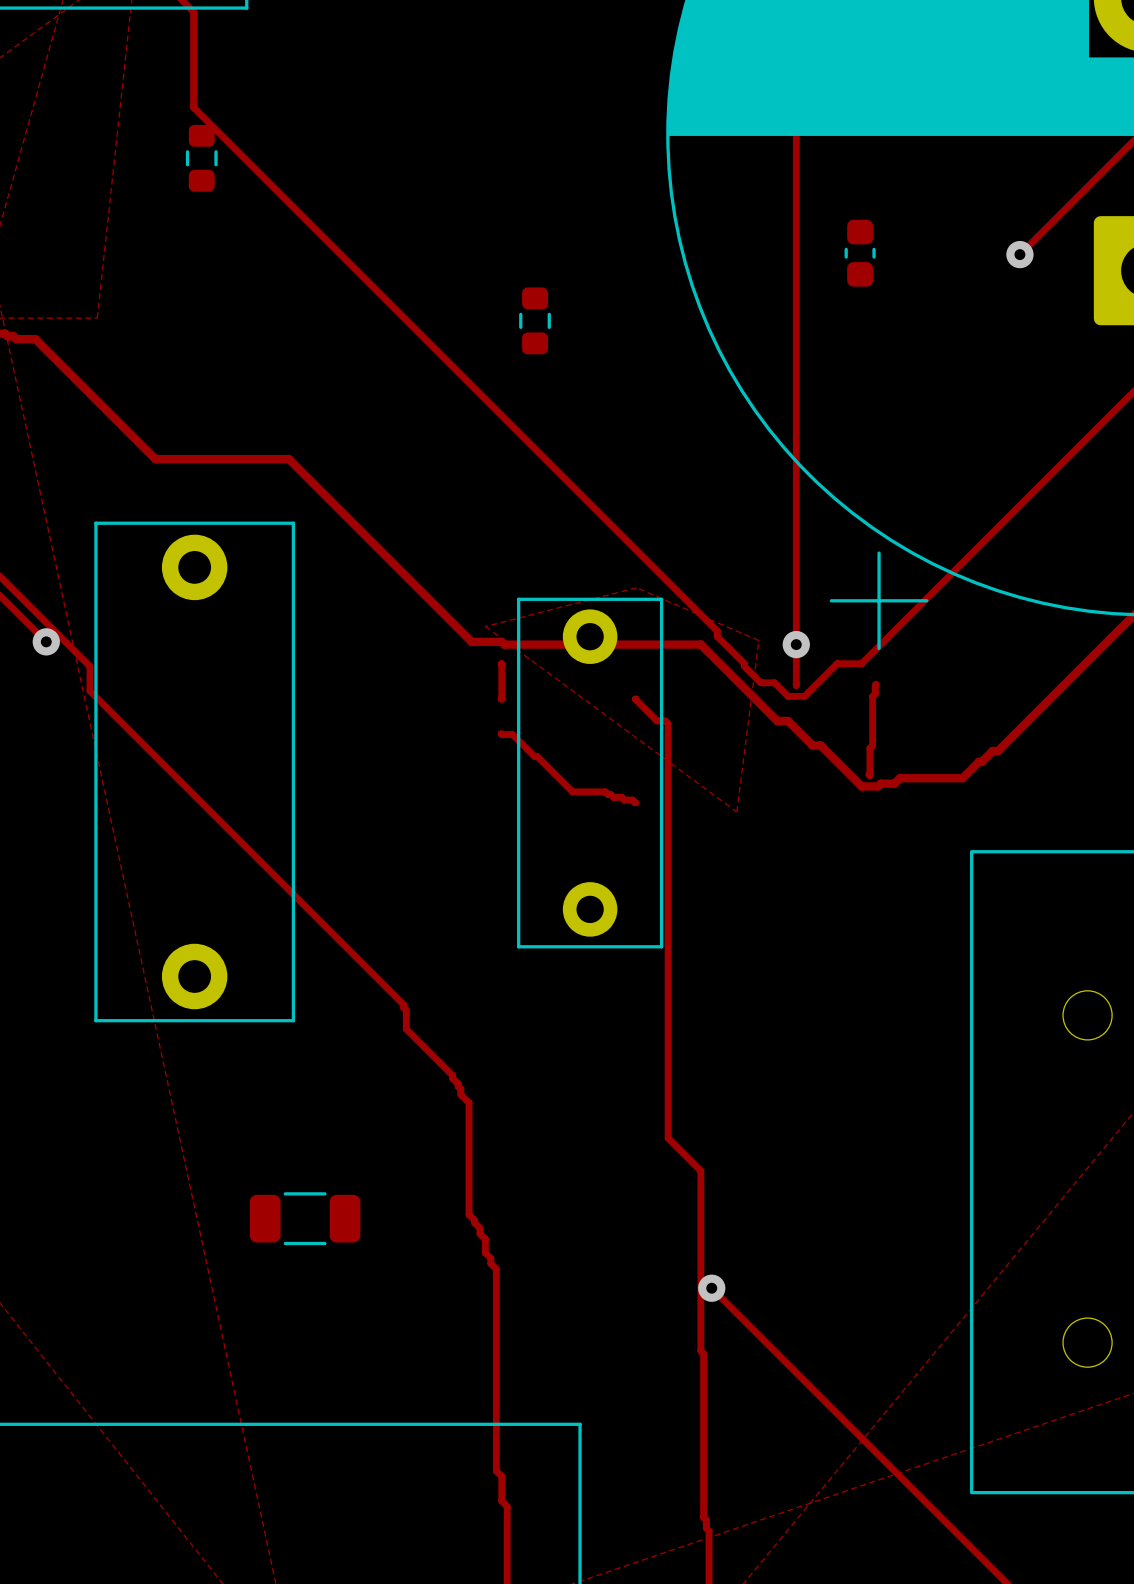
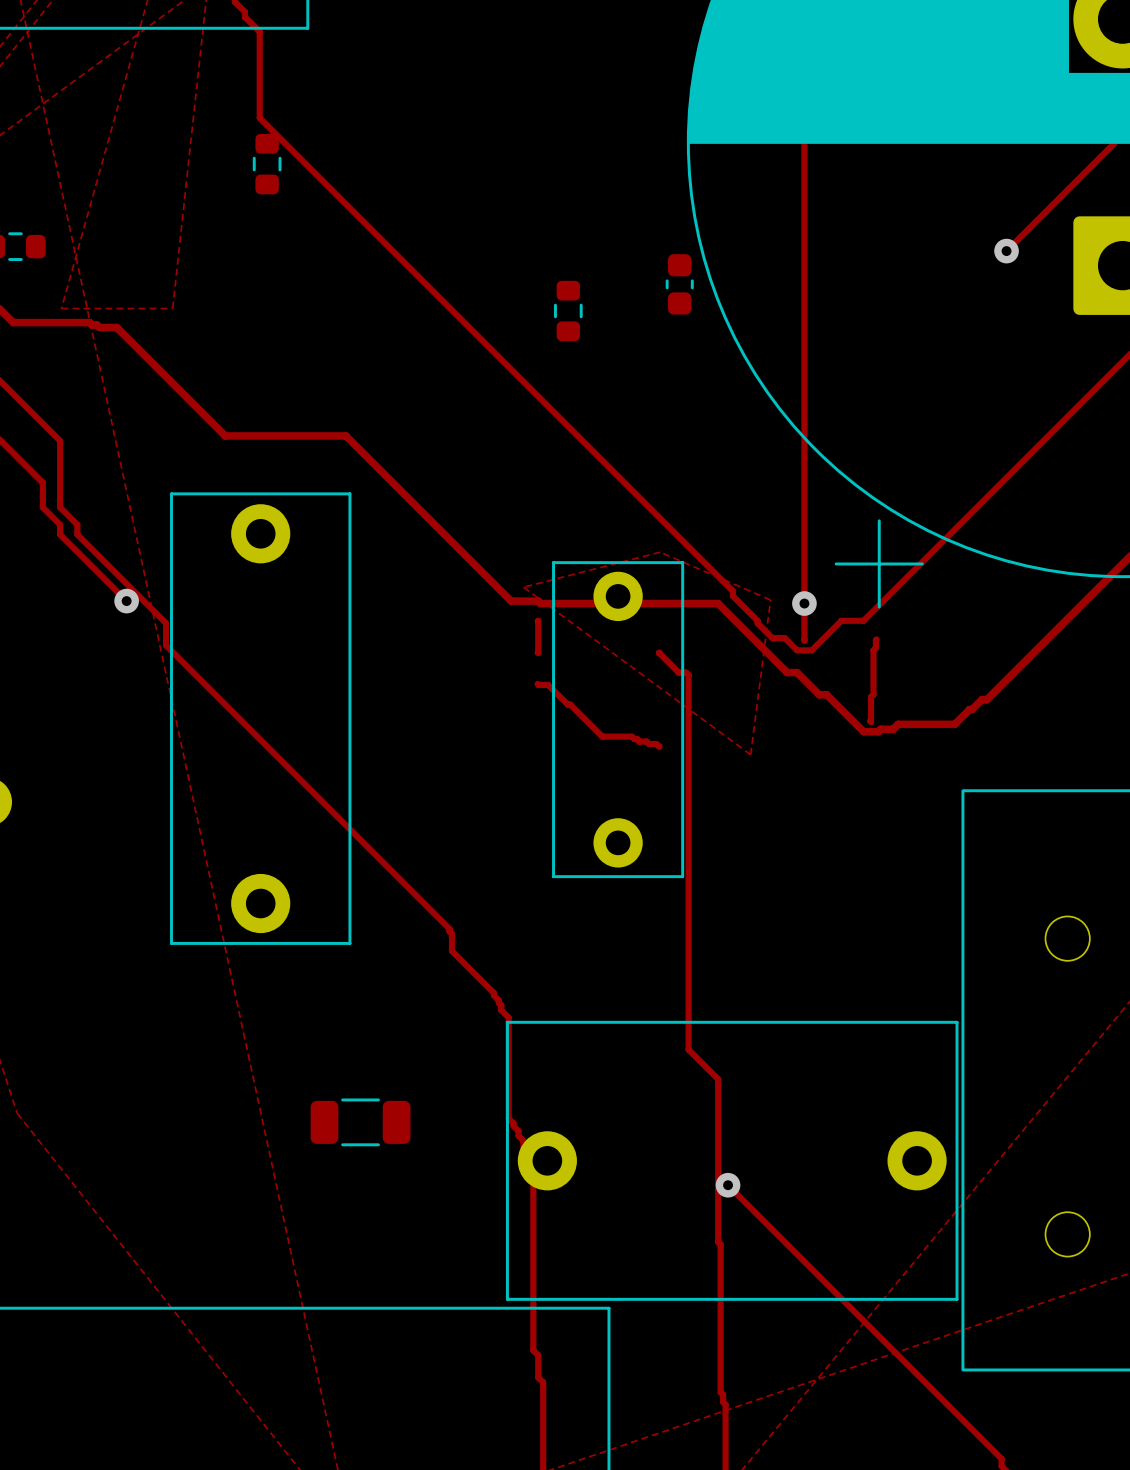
part position: (860, 253) -> (679, 284)
part: none -> (732, 1160)

